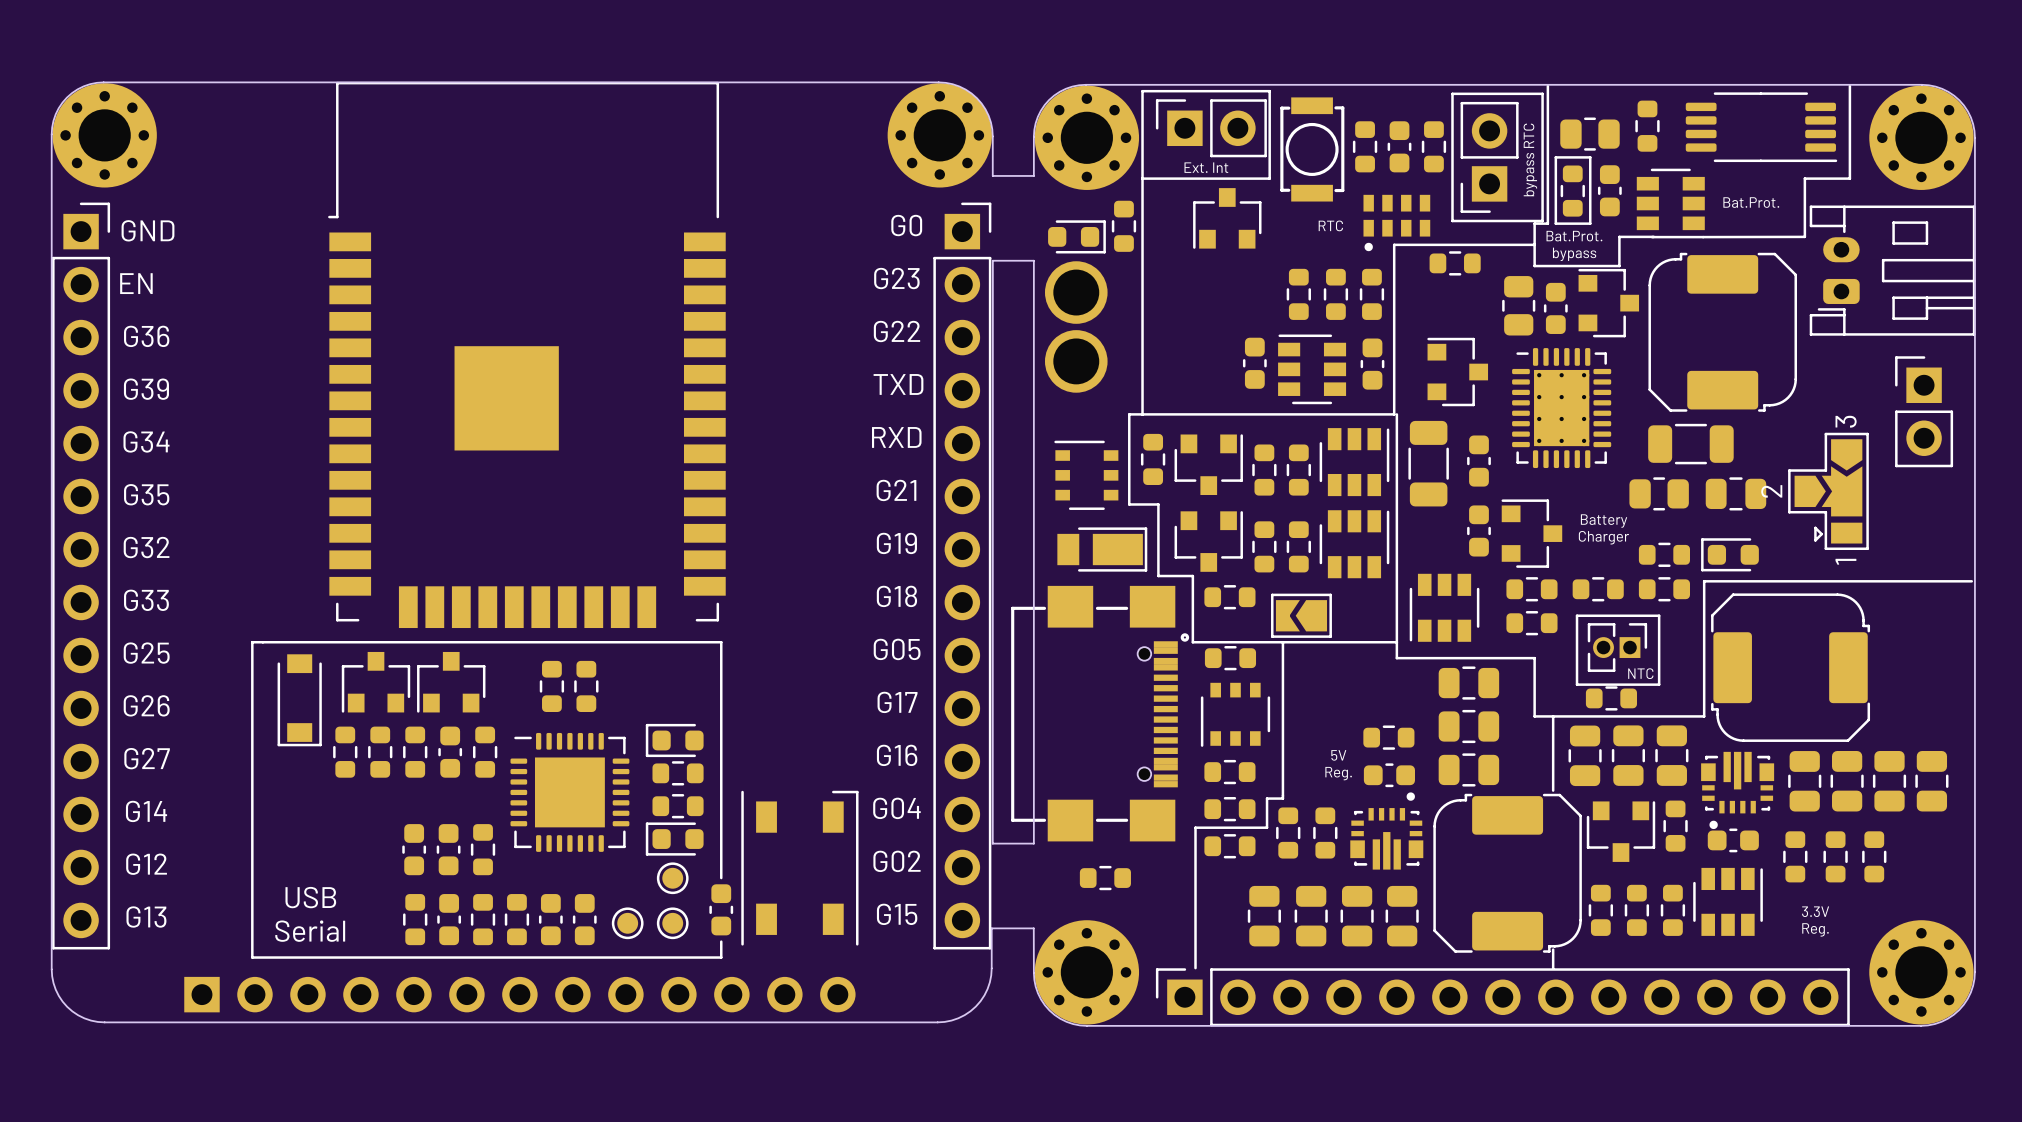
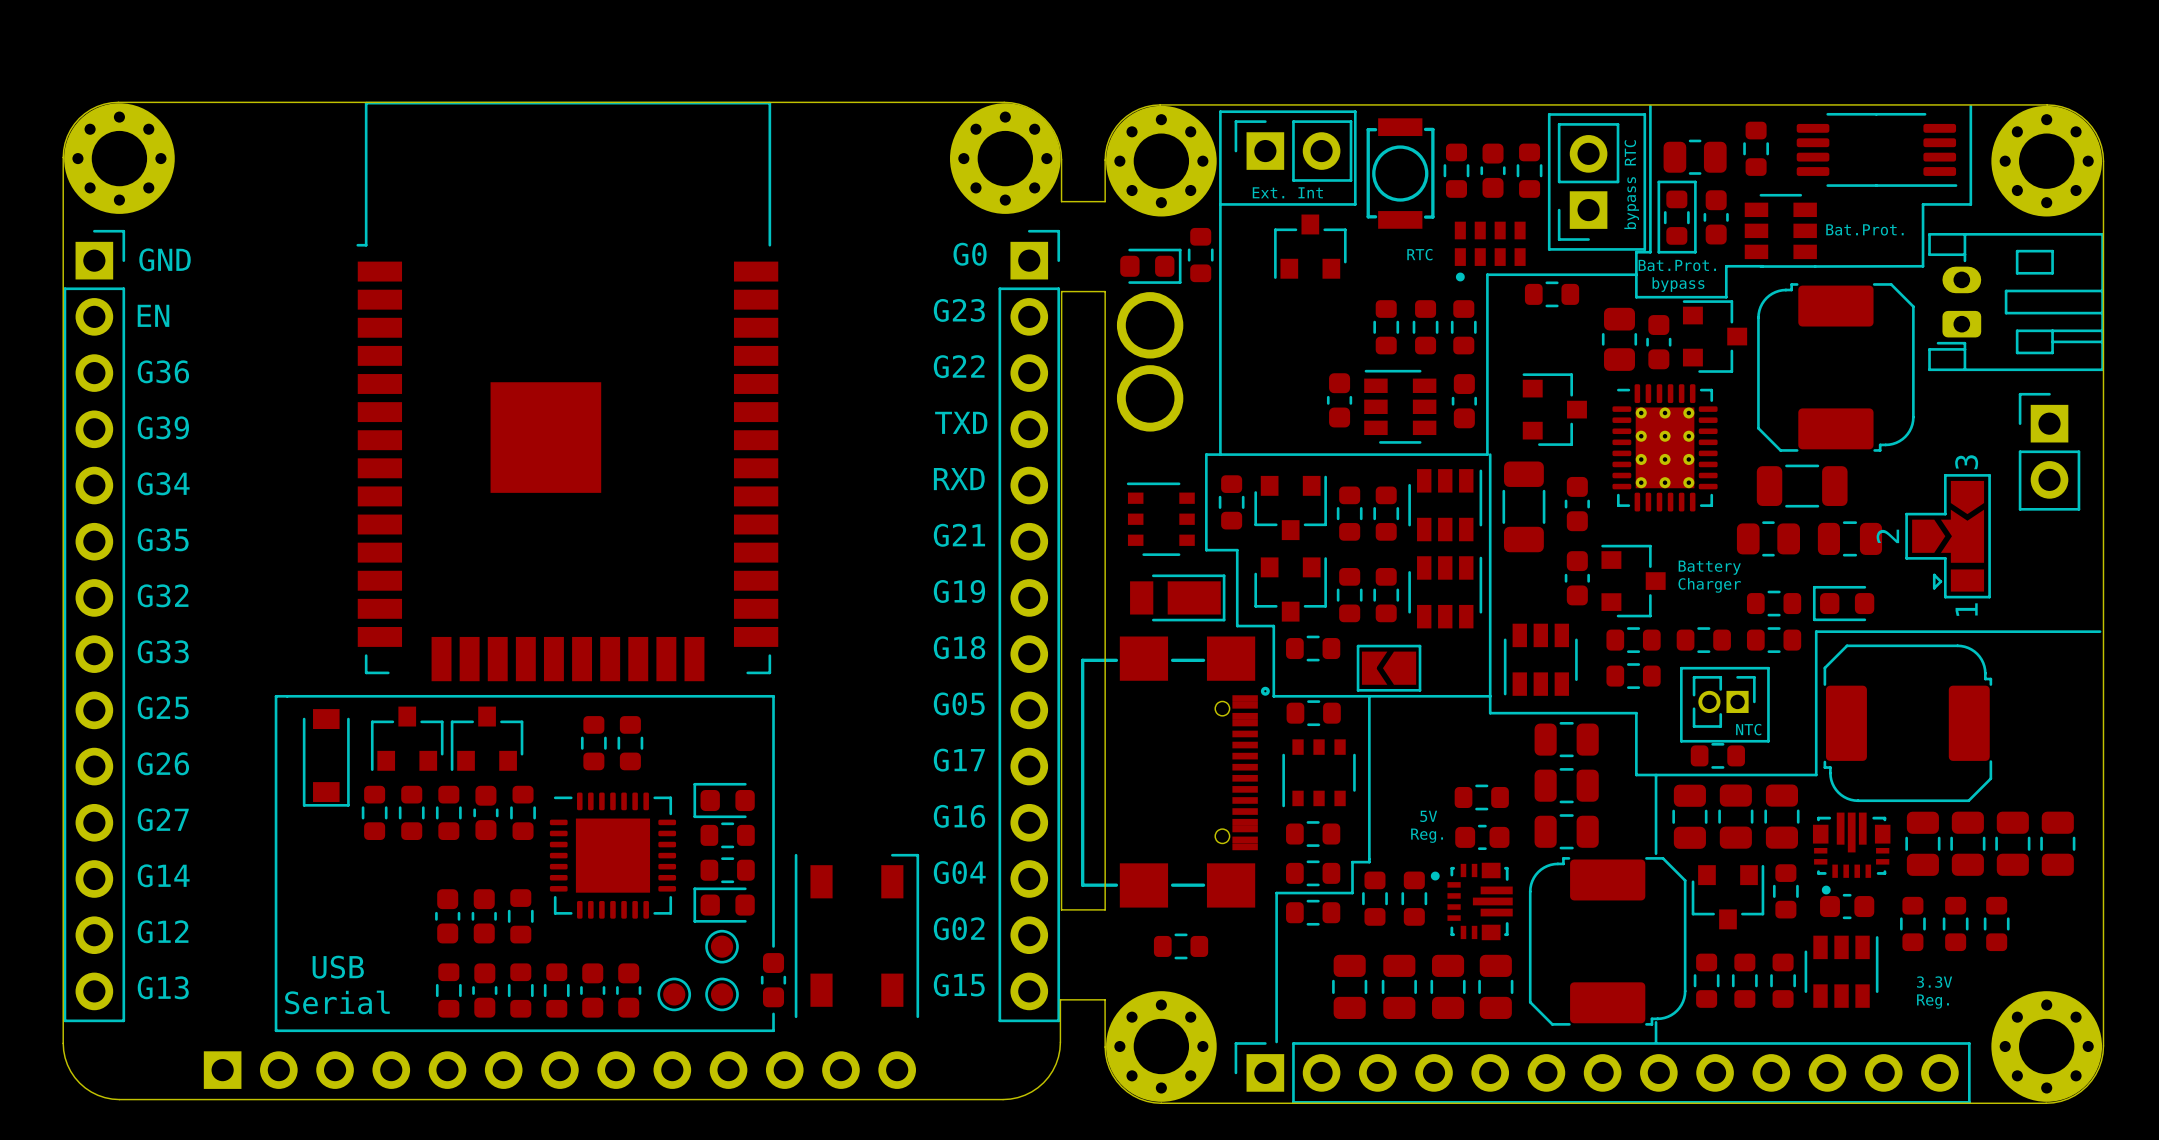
part rotation: 0° (1386, 831) -> 90° counterclockwise (1471, 901)

